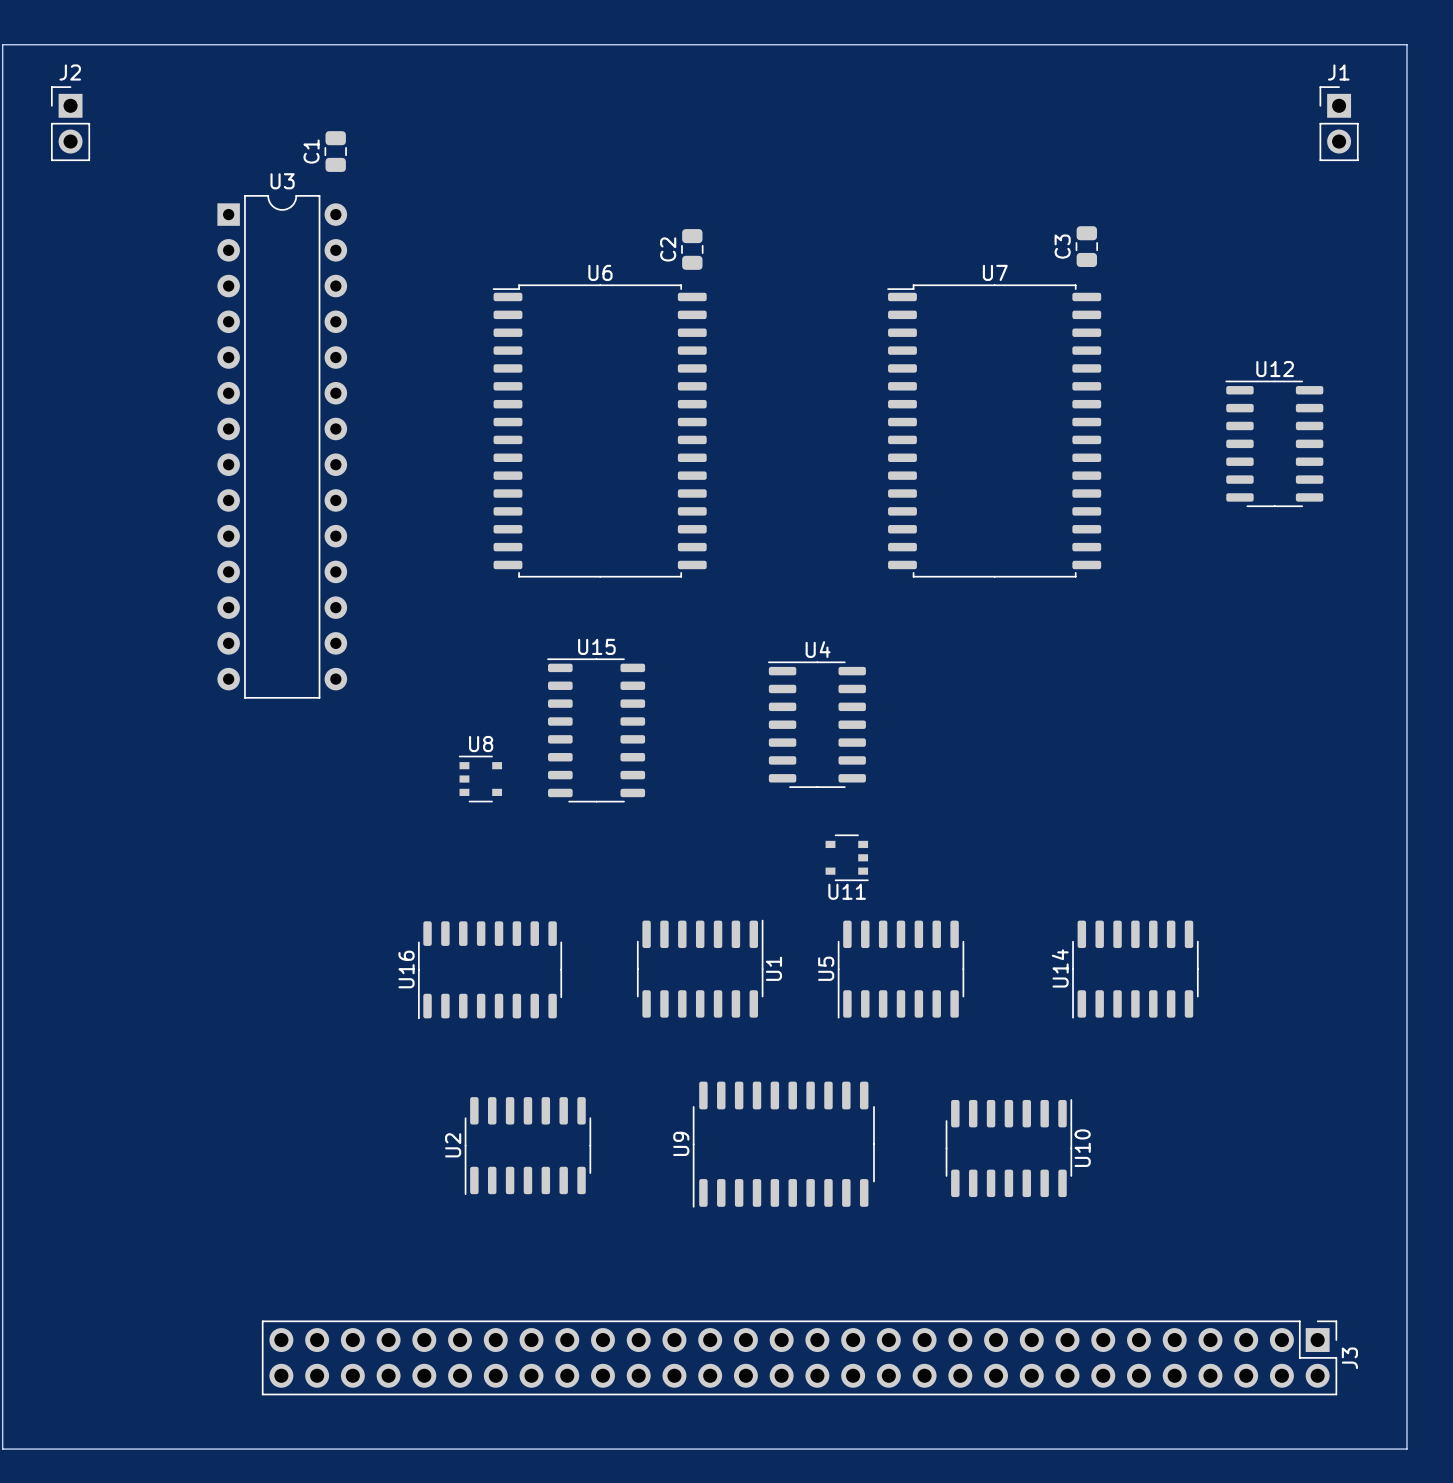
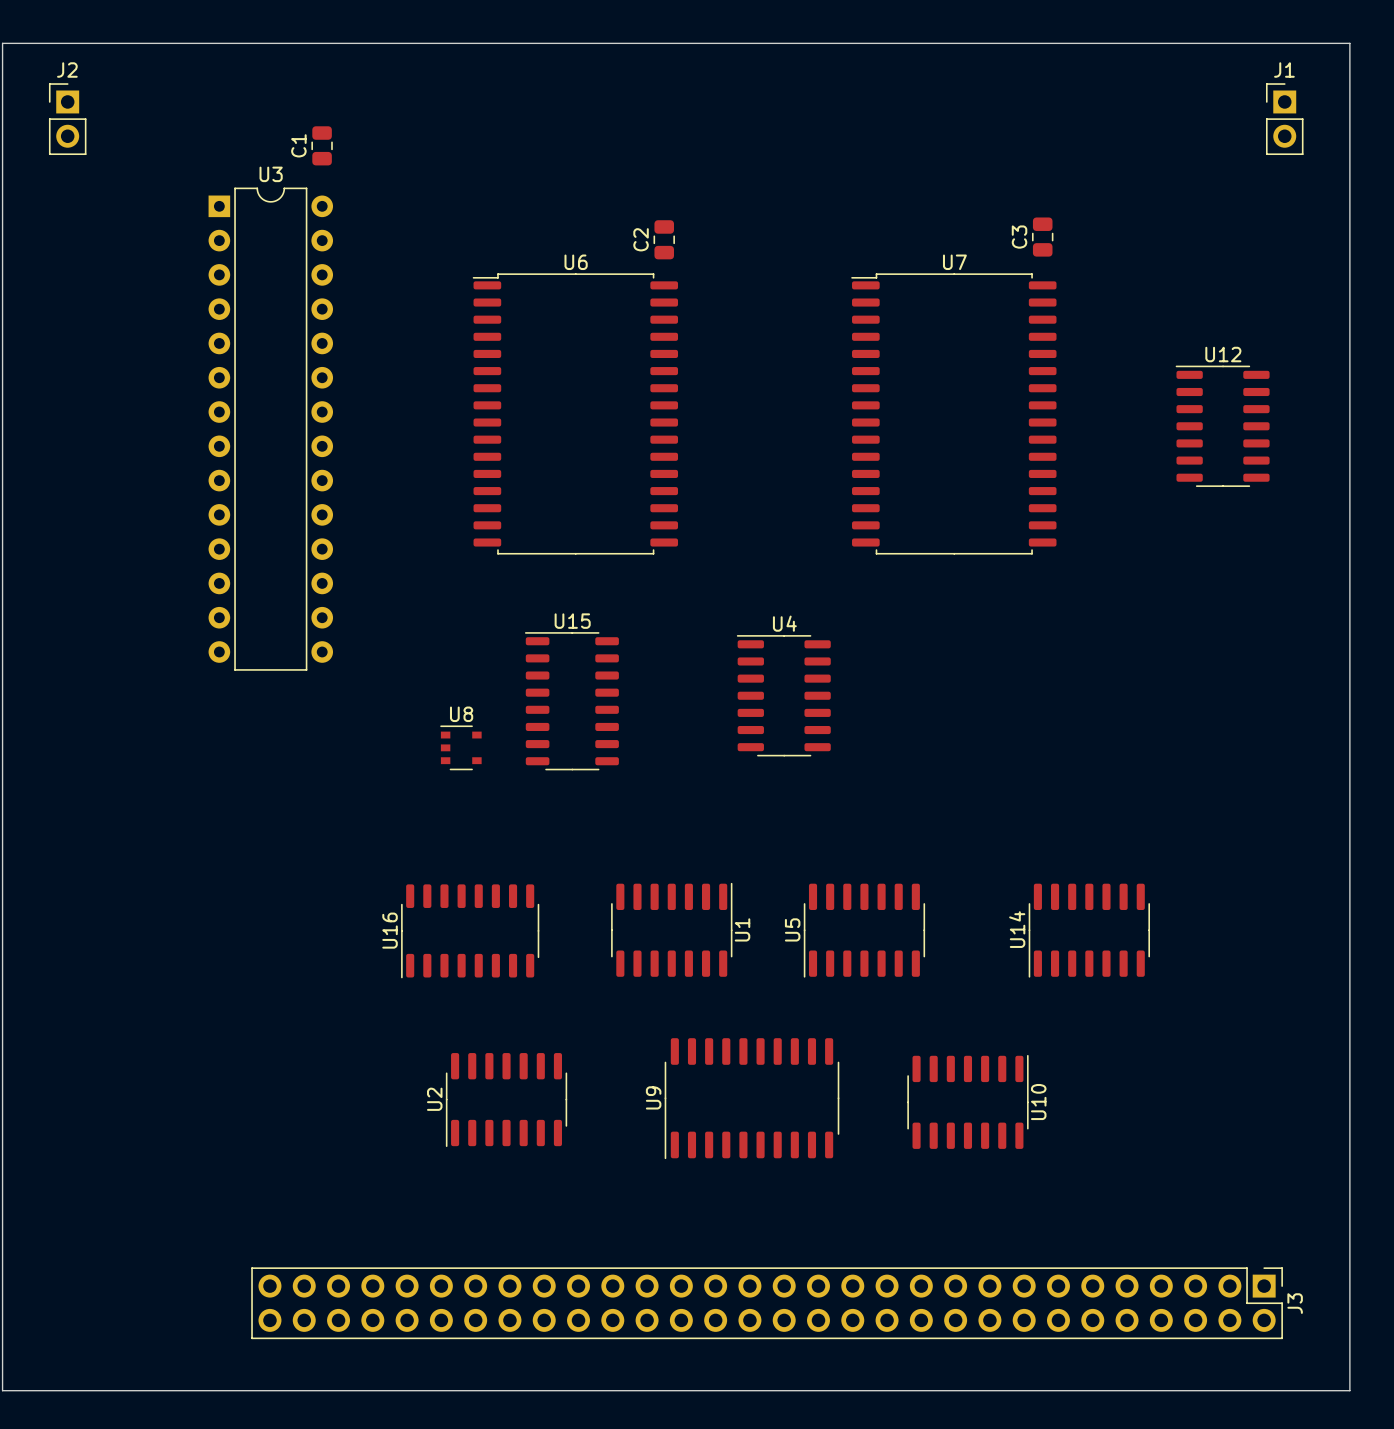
U11: (847, 857) -> none

